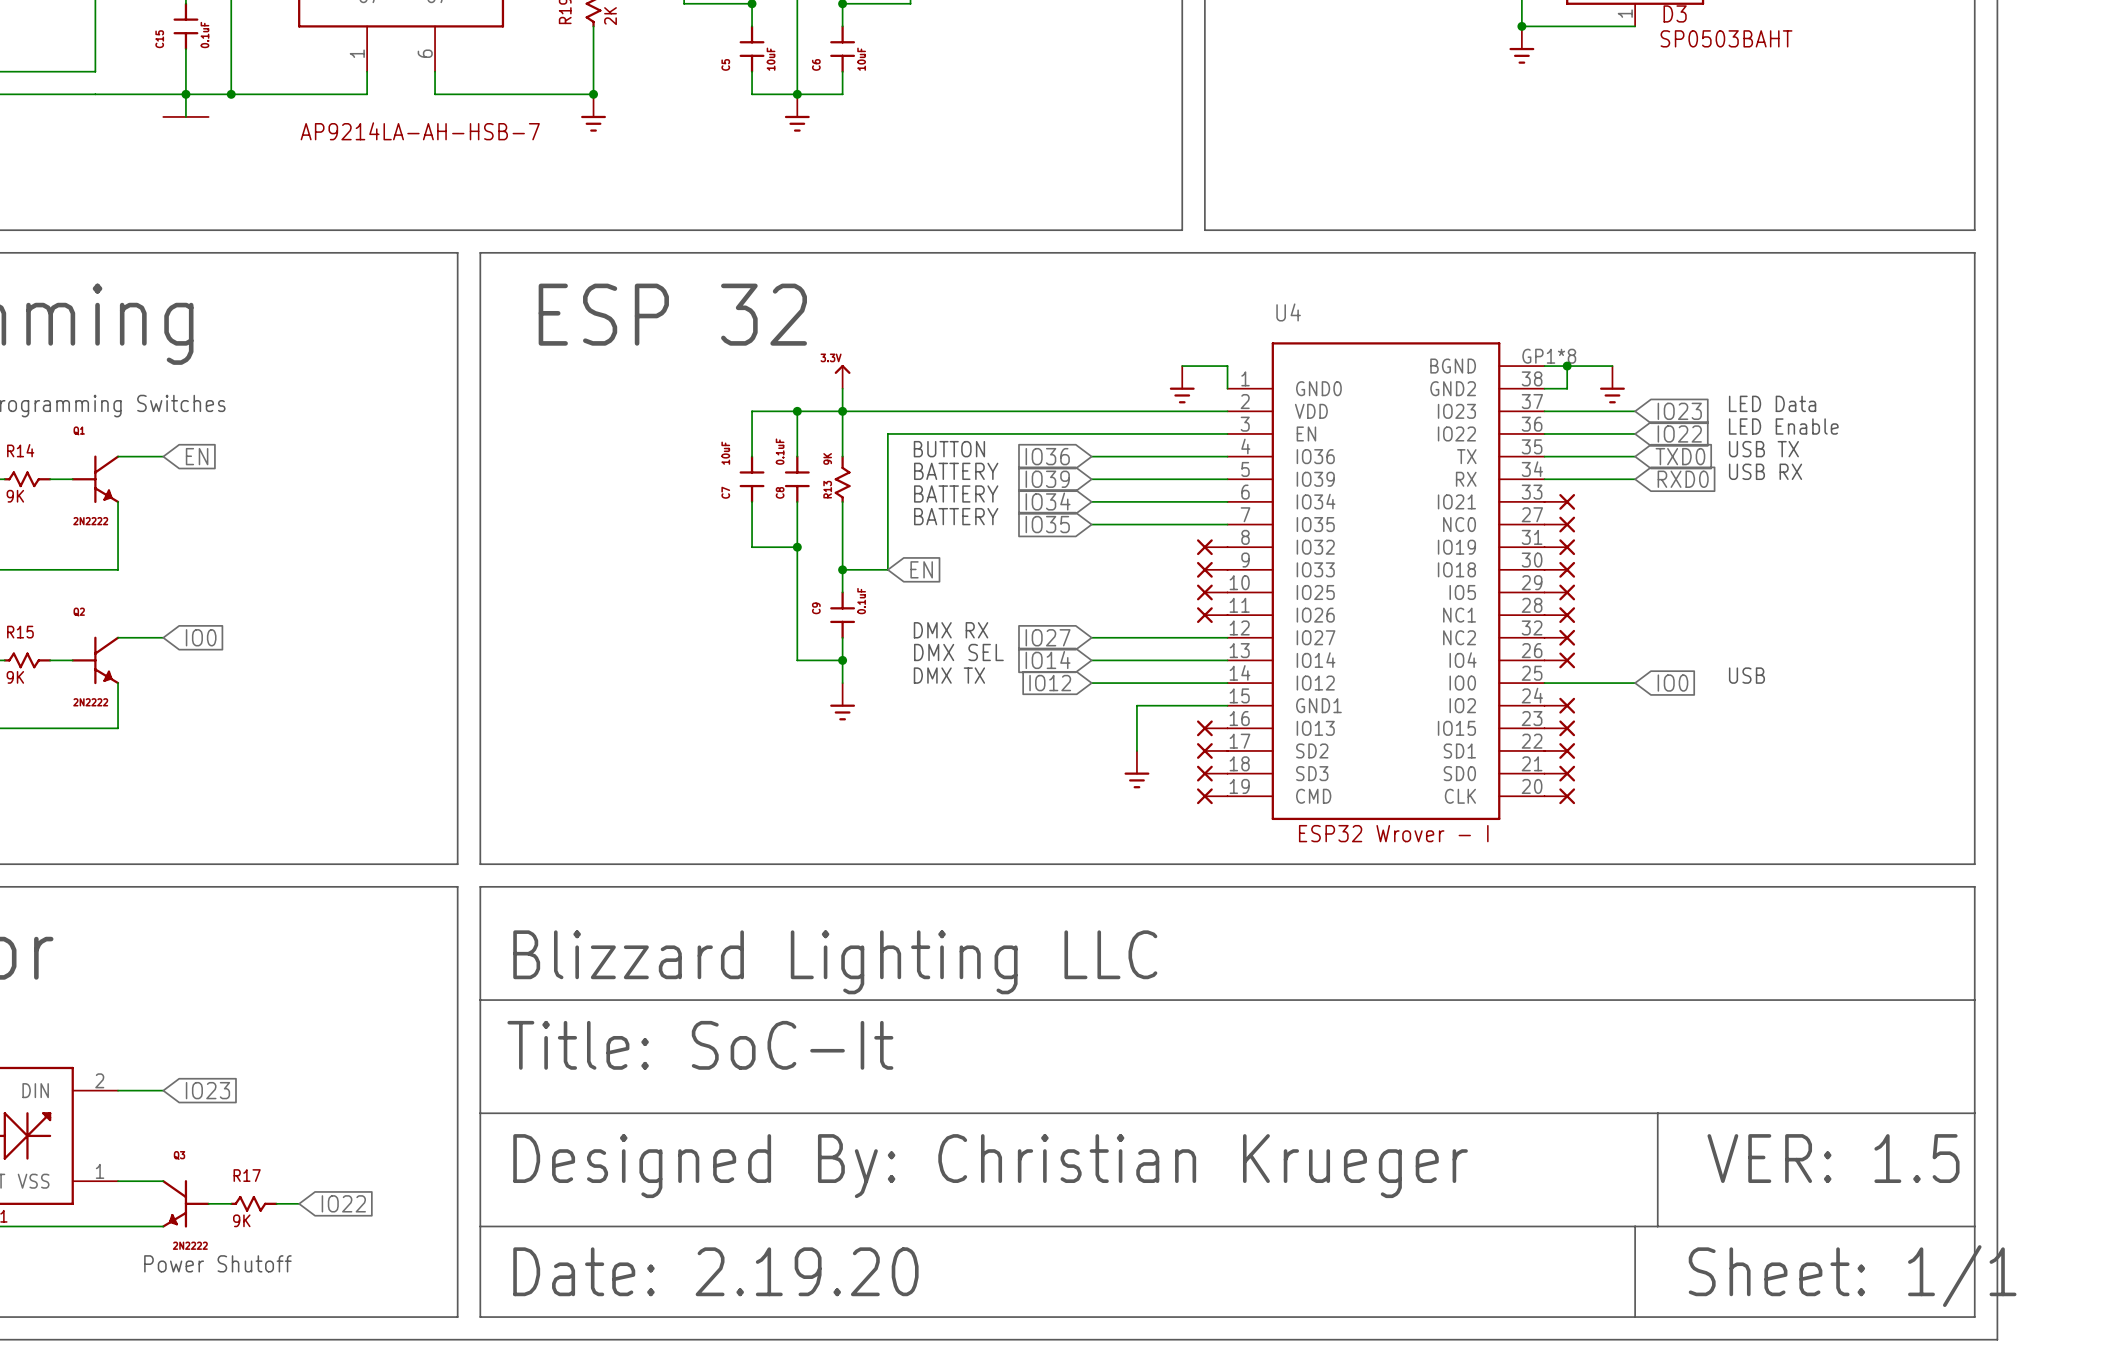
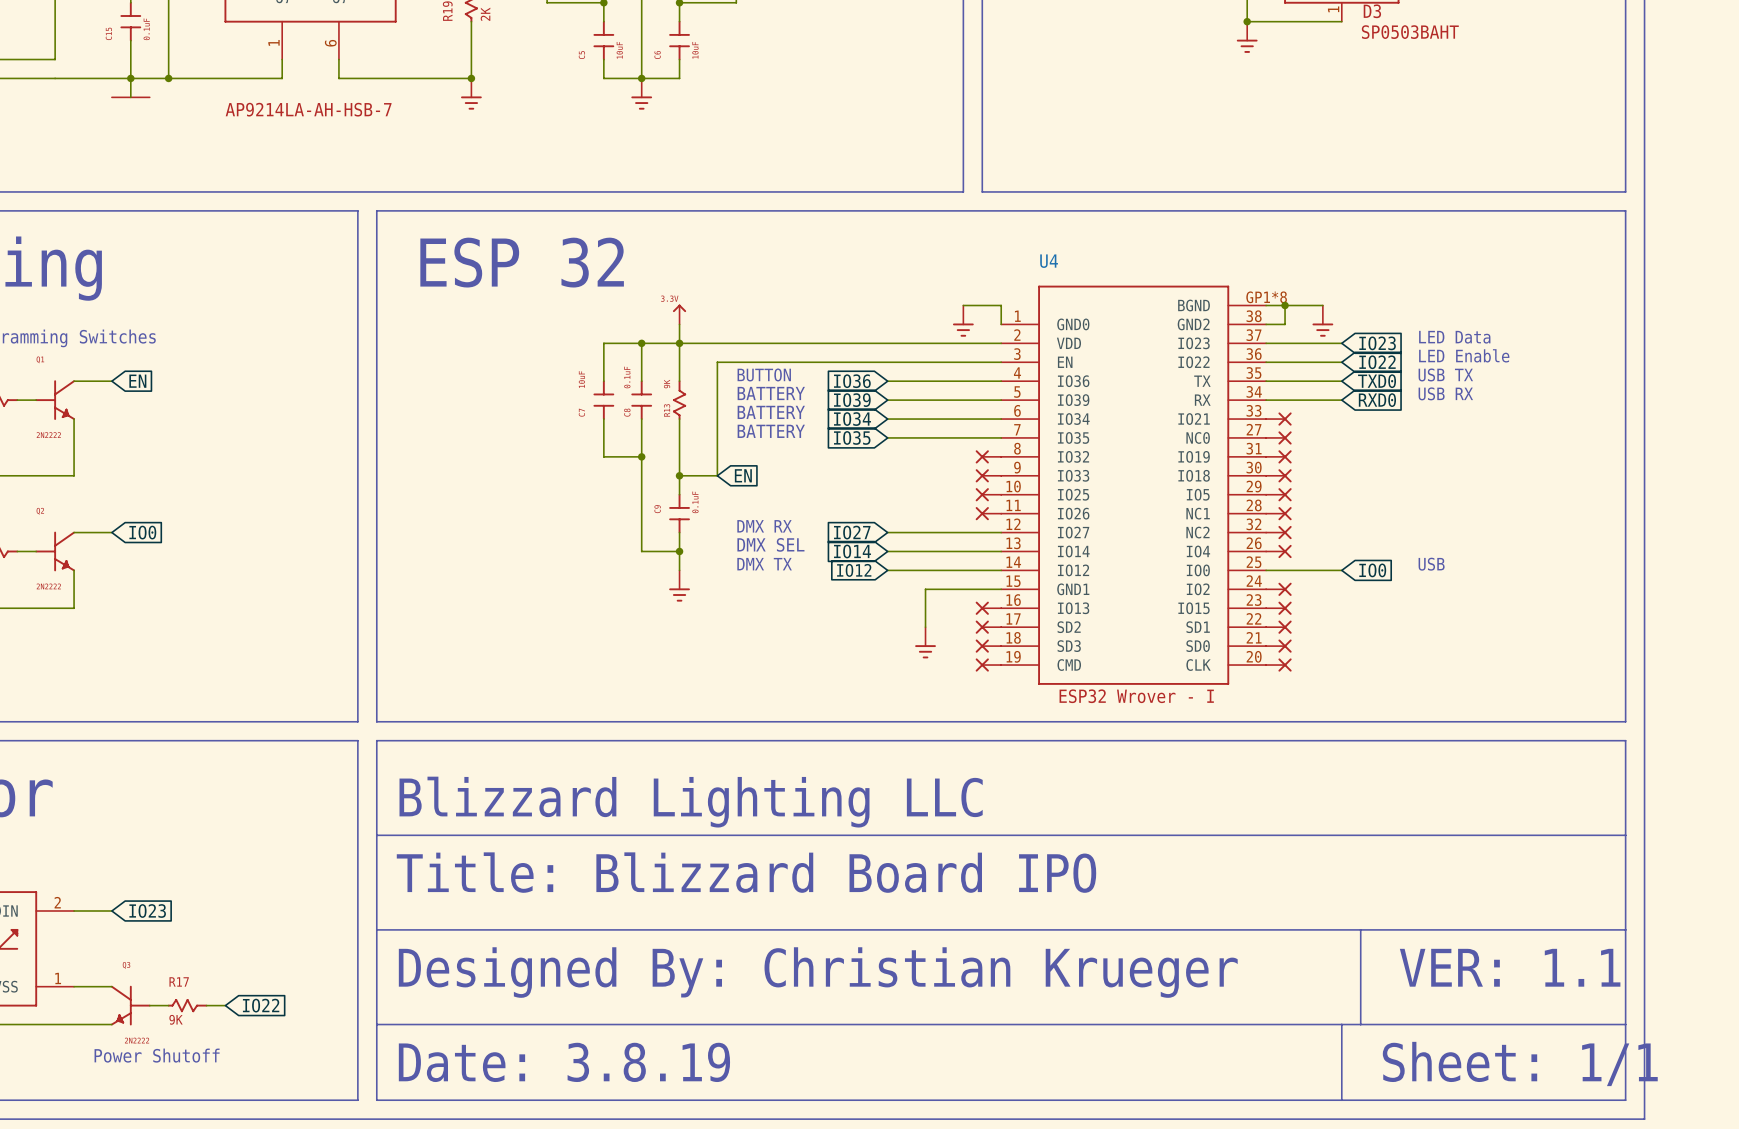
text: Title: SoC-It (700, 1045) -> Title: Blizzard Board IPO (746, 872)
text: VER: 1.5 (1833, 1158) -> VER: 1.1 (1510, 967)
text: Date: 2.19.20 (715, 1271) -> Date: 3.8.19 (564, 1062)

